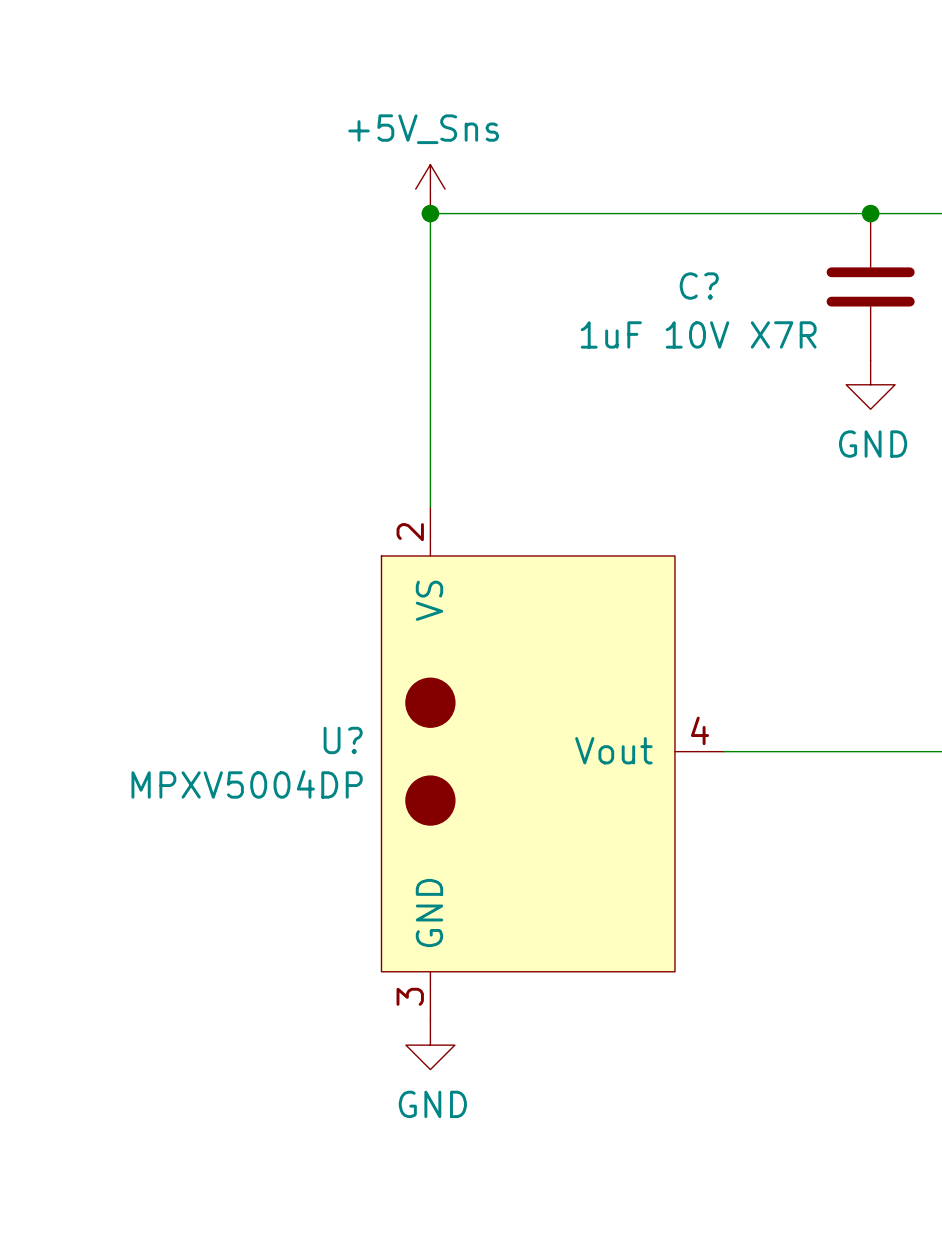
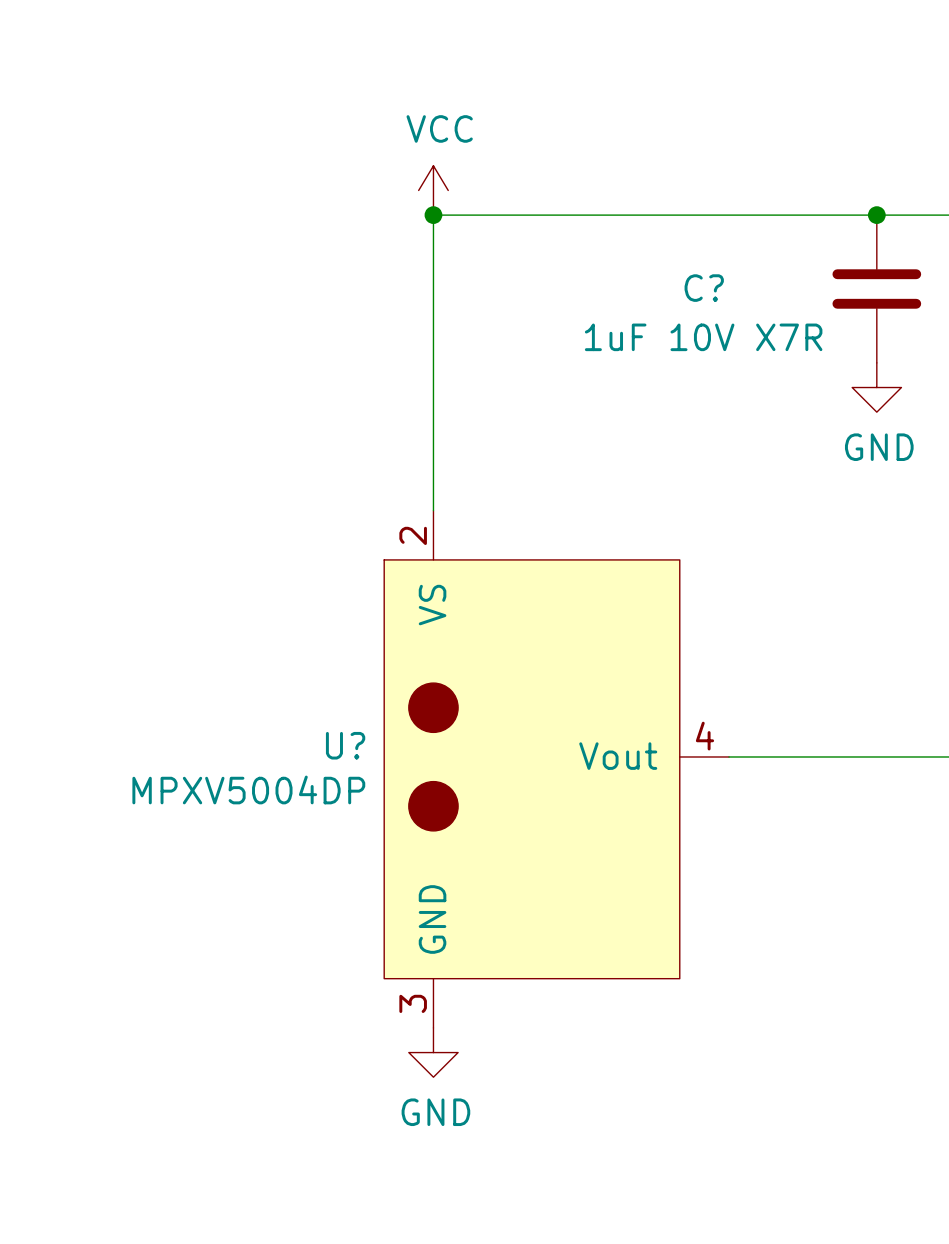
power symbol: +5V_Sns (430, 189) -> VCC (433, 190)

